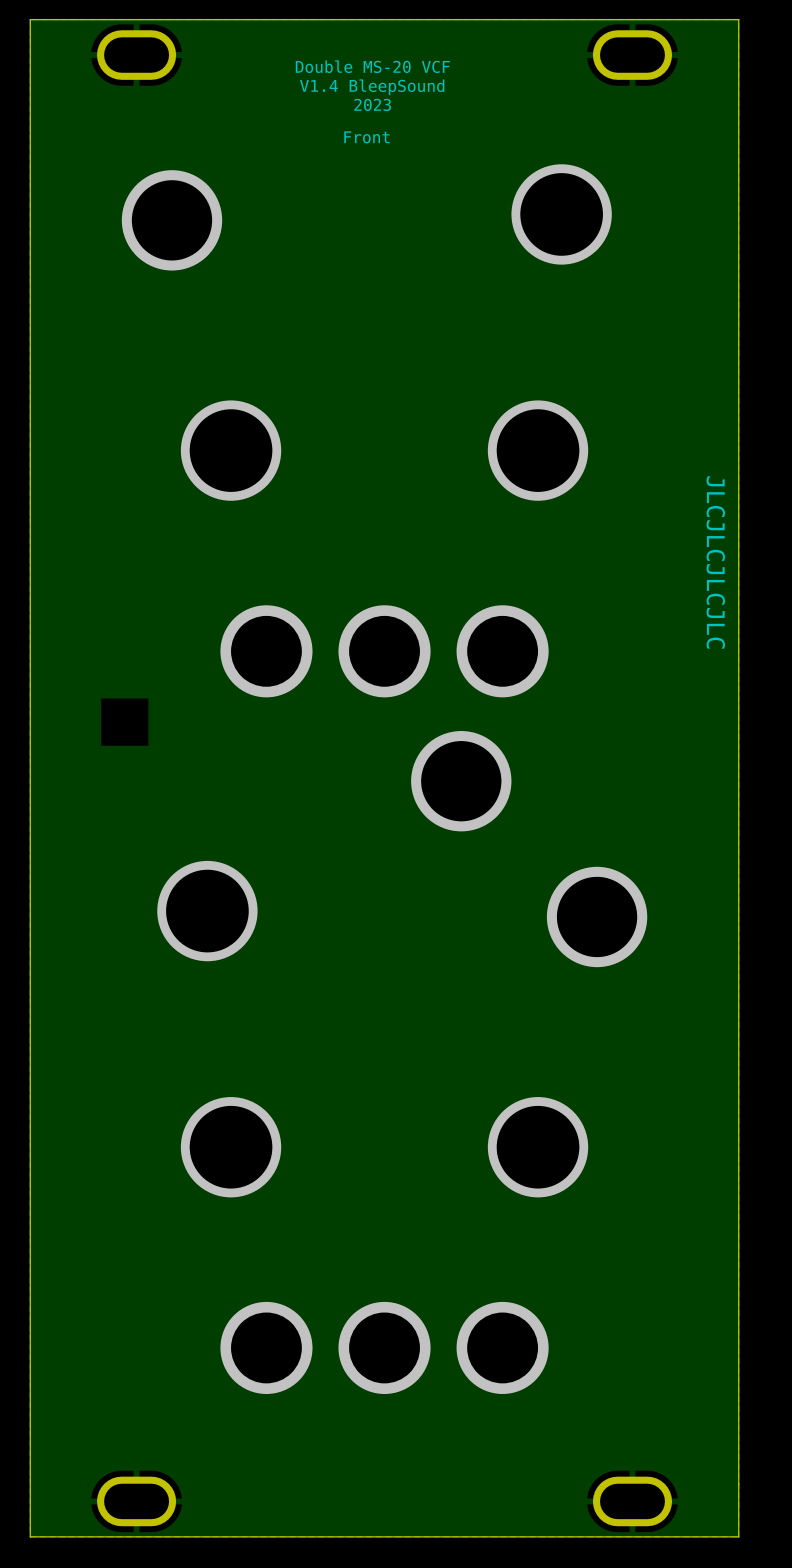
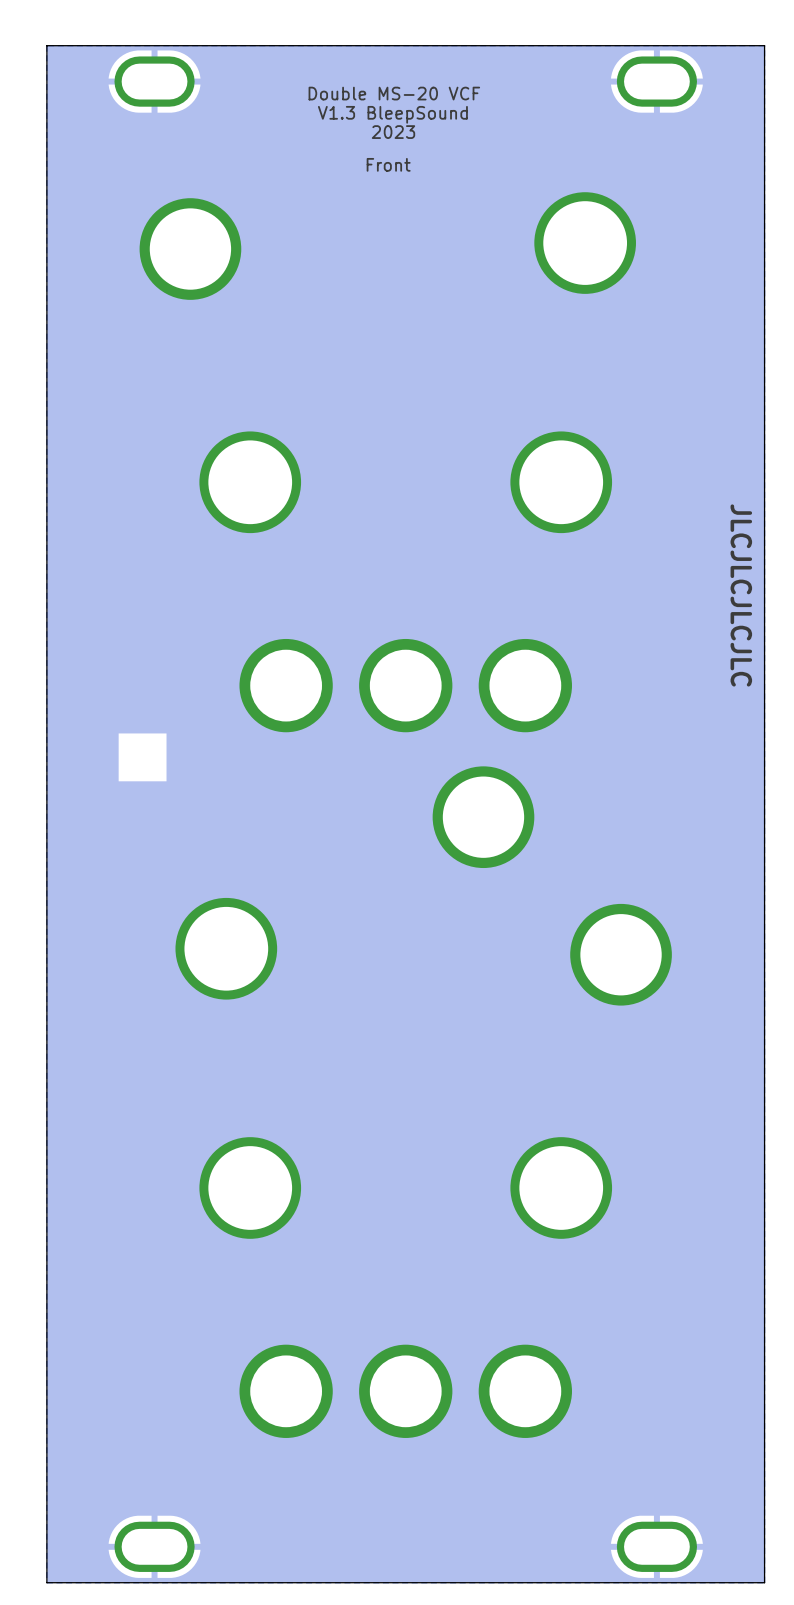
text: V1.4 BleepSound (372, 87) -> V1.3 BleepSound (392, 114)

